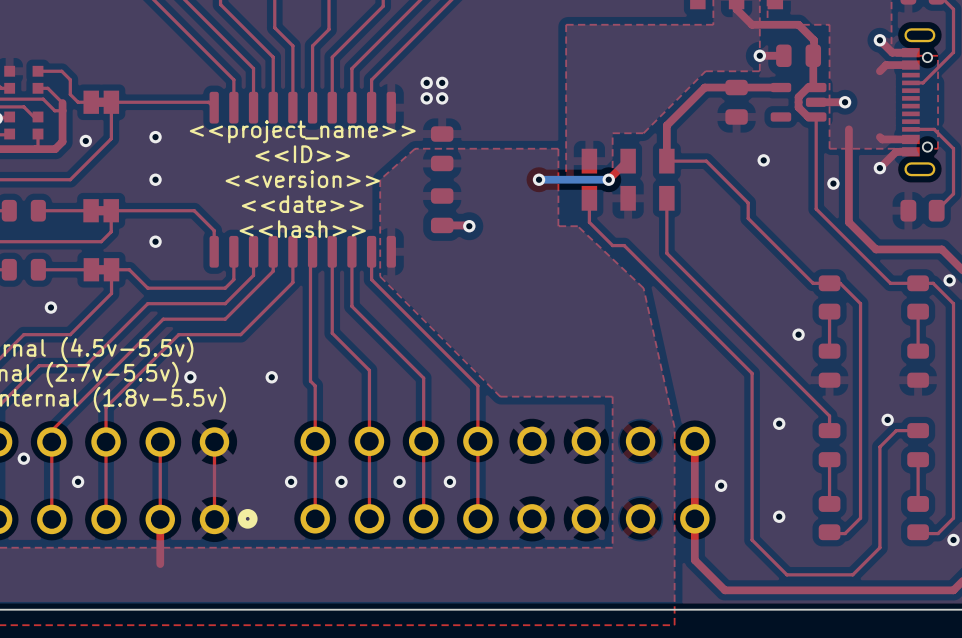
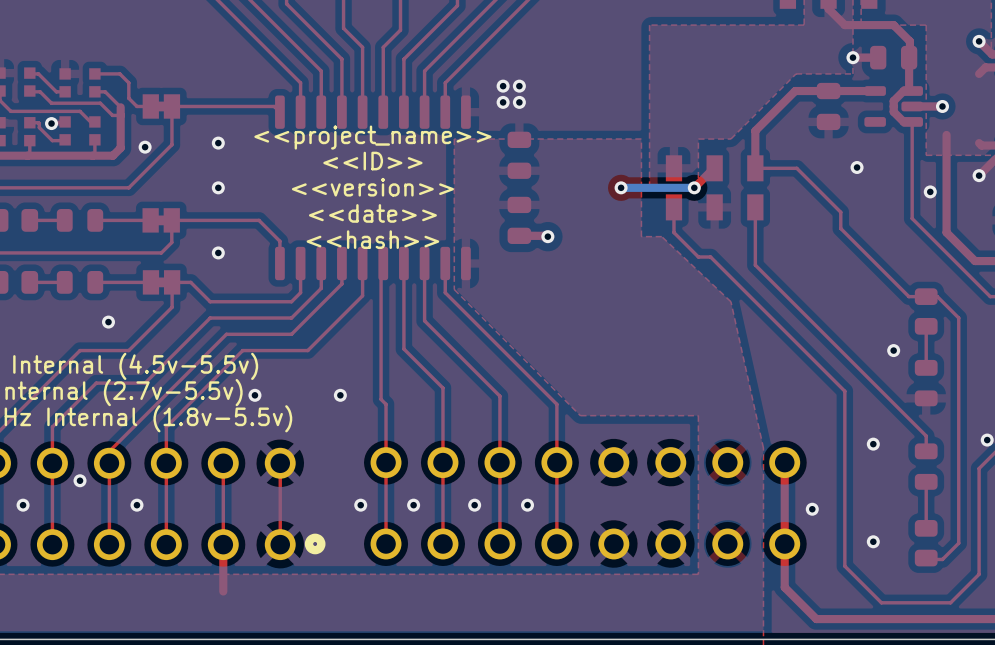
top zone outline: (558, 148) (415, 148) (380, 179) -> (641, 155) (641, 139) (454, 139) (454, 187)

